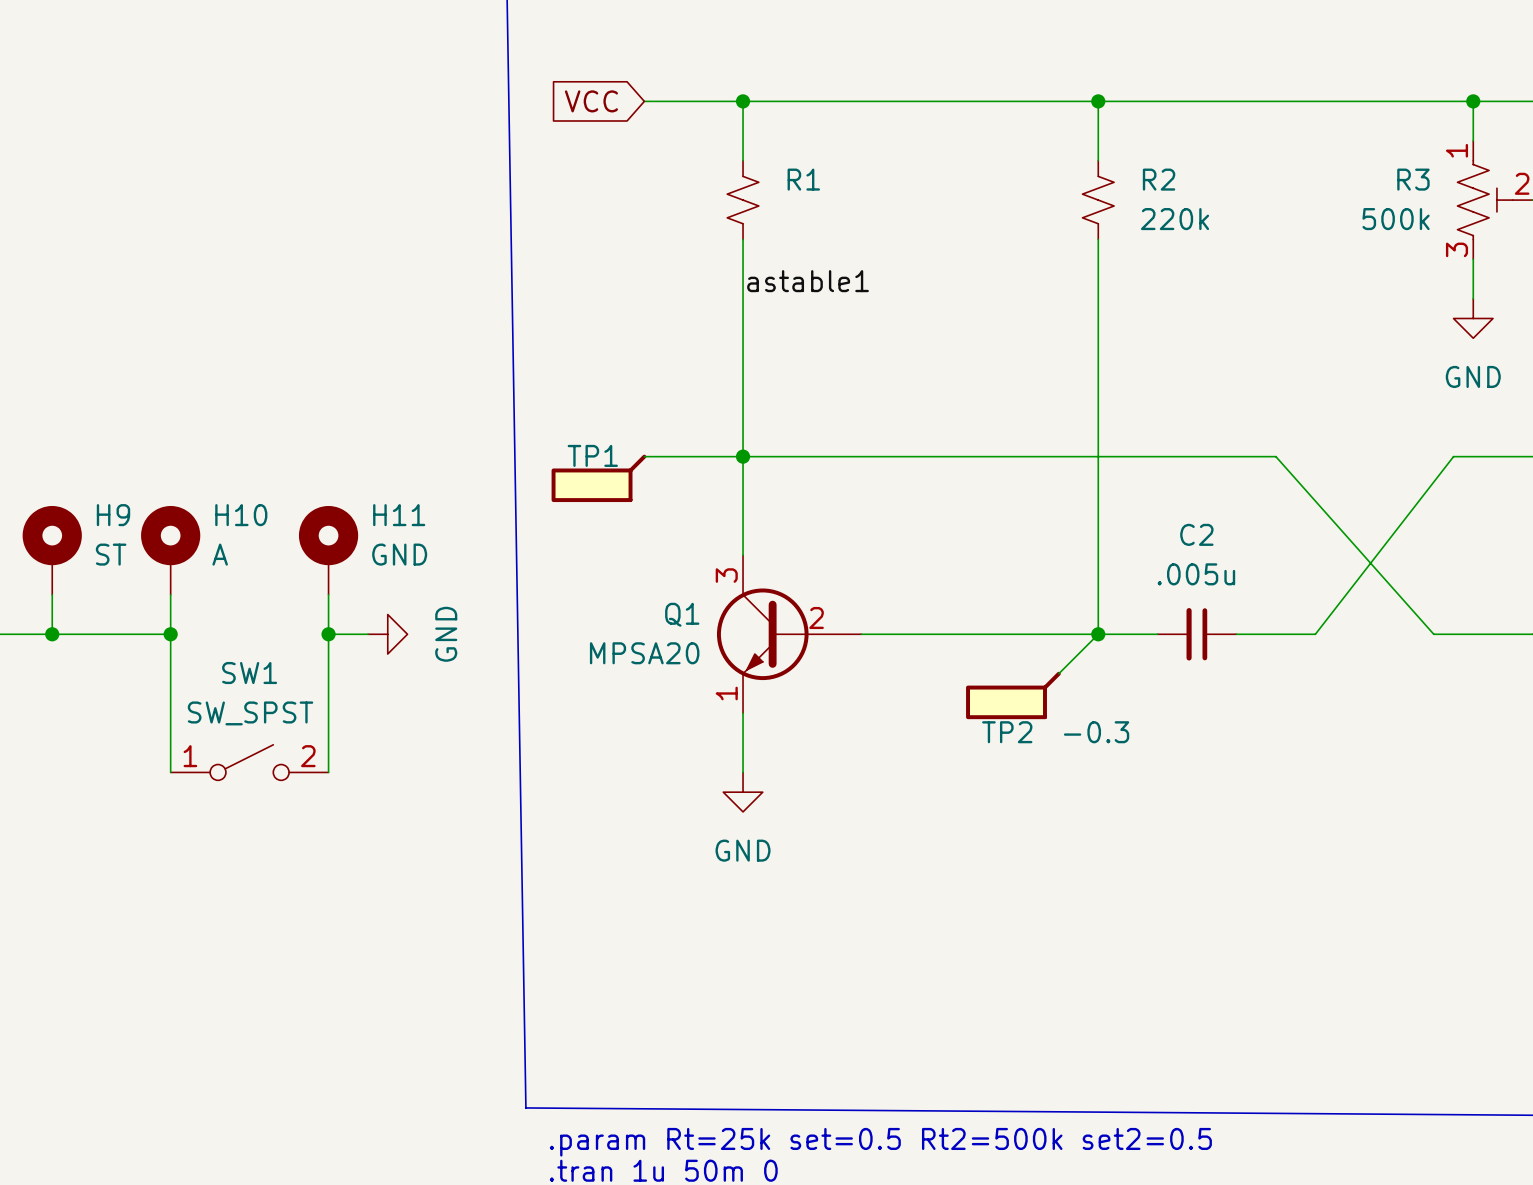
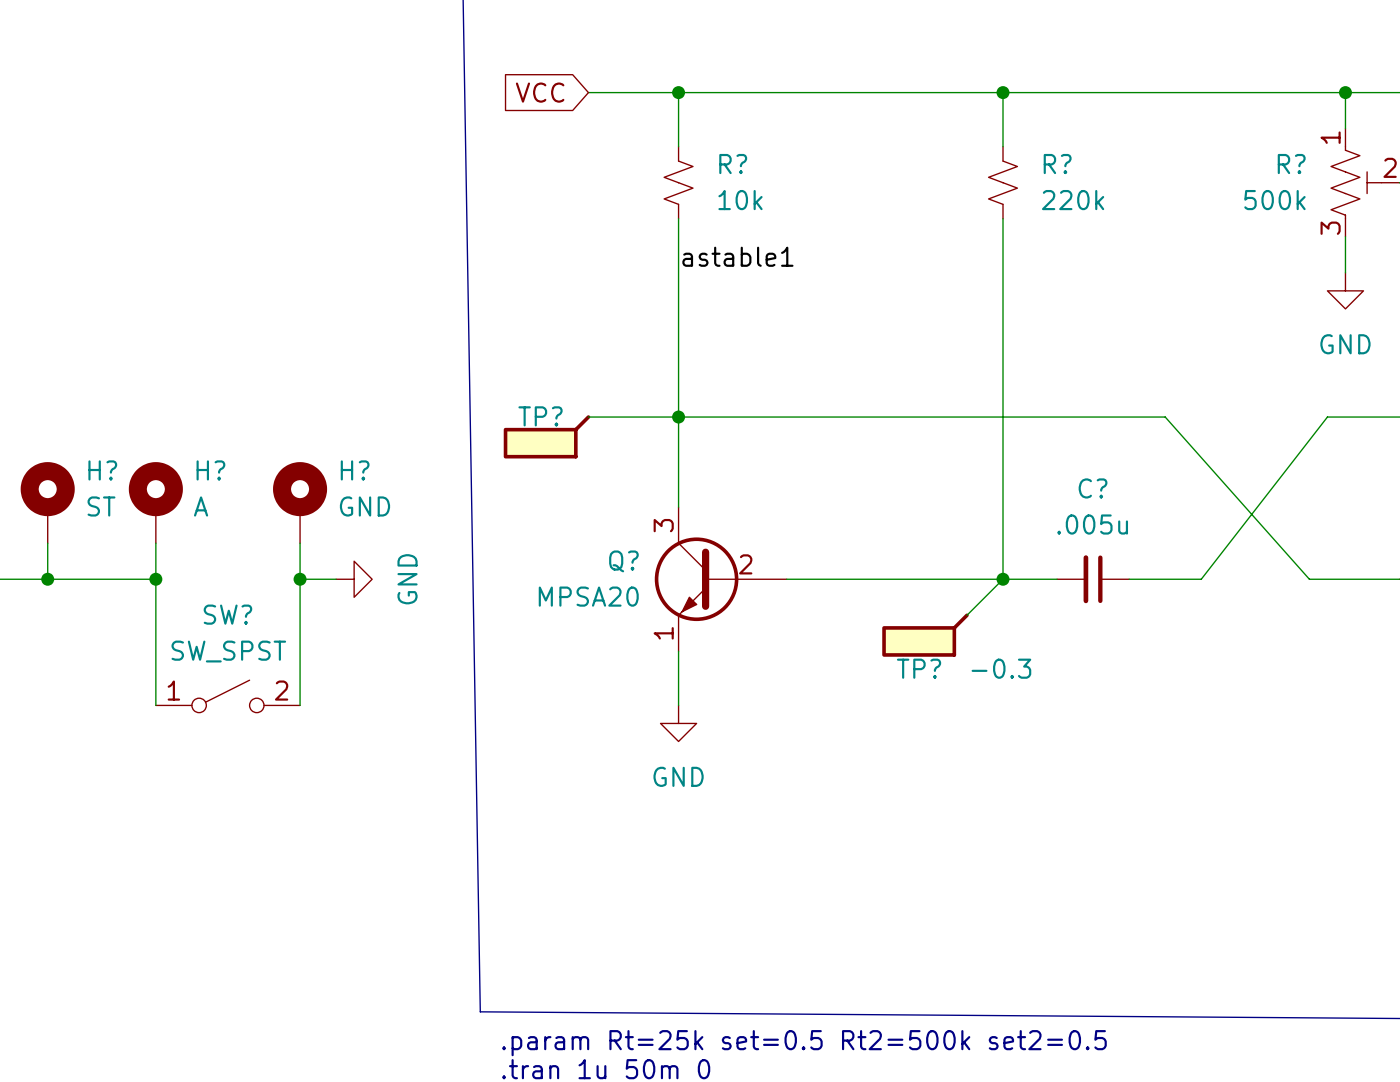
R1 name: R1 (803, 179) -> R? (733, 164)
R2 name: R2 (1159, 179) -> R? (1057, 164)
R3 name: R3 (1413, 179) -> R? (1291, 164)
R1 value: none -> 10k (740, 200)
TP1 name: TP1 (592, 455) -> TP? (540, 416)
H9 name: H9 (113, 515) -> H? (102, 470)
H10 name: H10 (241, 515) -> H? (210, 470)
H11 name: H11 (399, 515) -> H? (355, 470)
C2 name: C2 (1196, 534) -> C? (1093, 488)
Q1 name: Q1 (682, 614) -> Q? (623, 561)
SW1 name: SW1 (249, 673) -> SW? (227, 614)
TP2 name: TP2 (1007, 732) -> TP? (919, 668)

